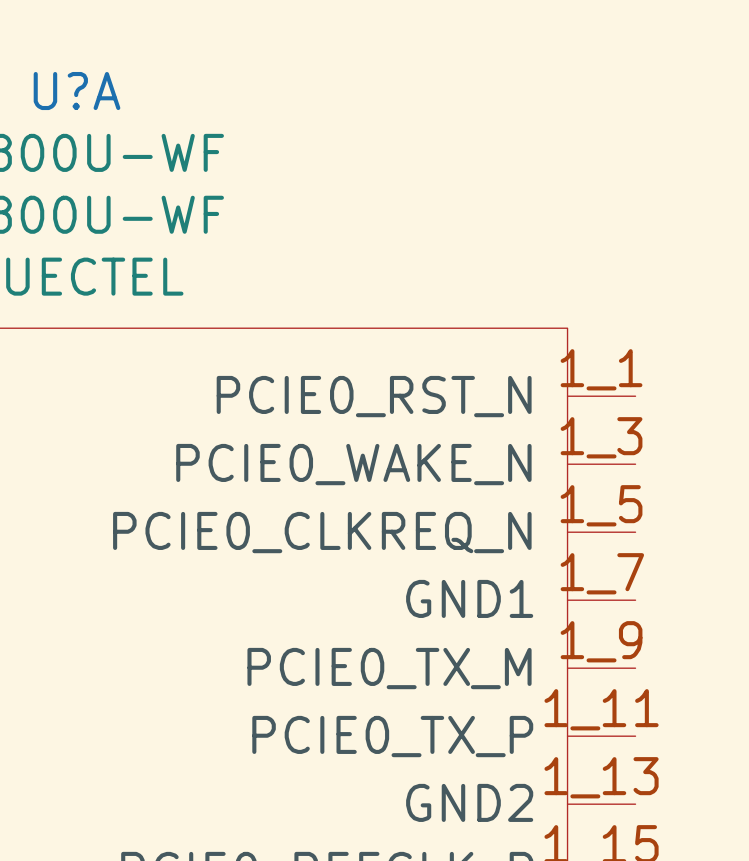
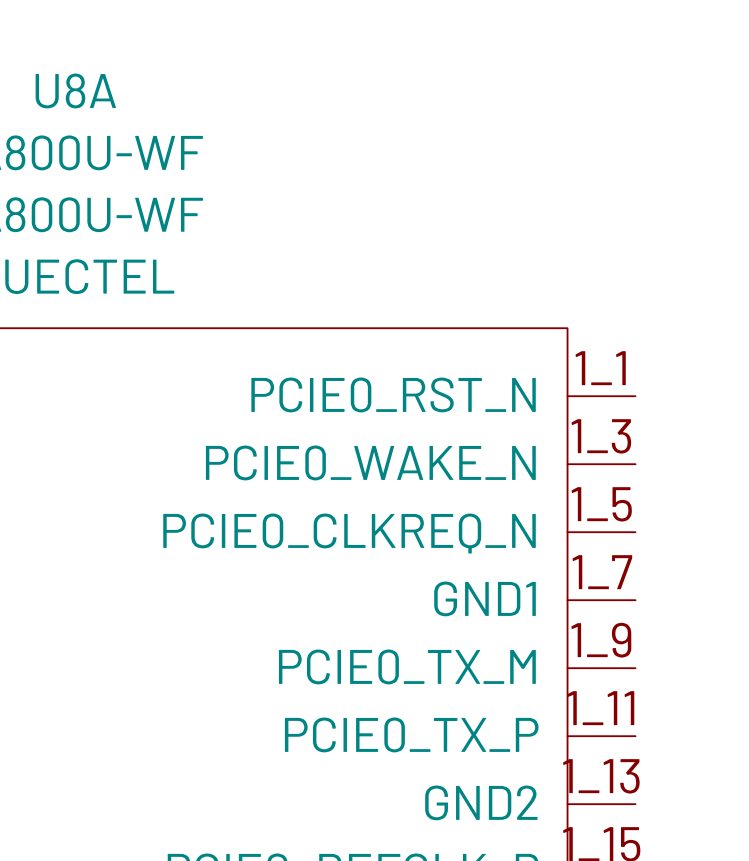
U?A name: U?A (77, 91) -> U8A (75, 90)

